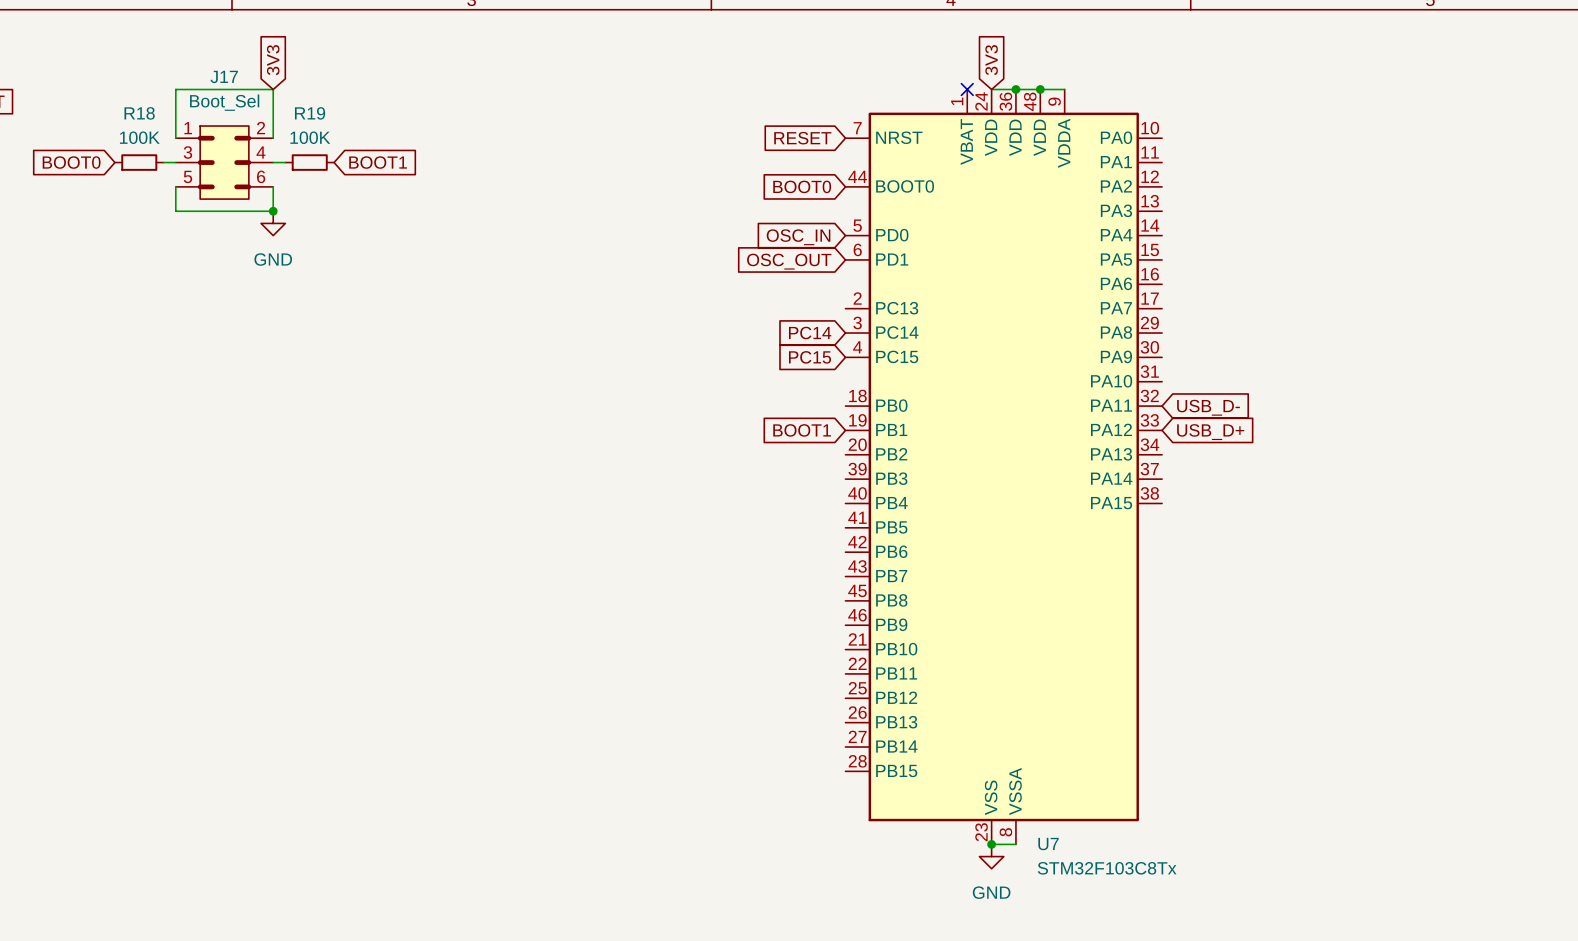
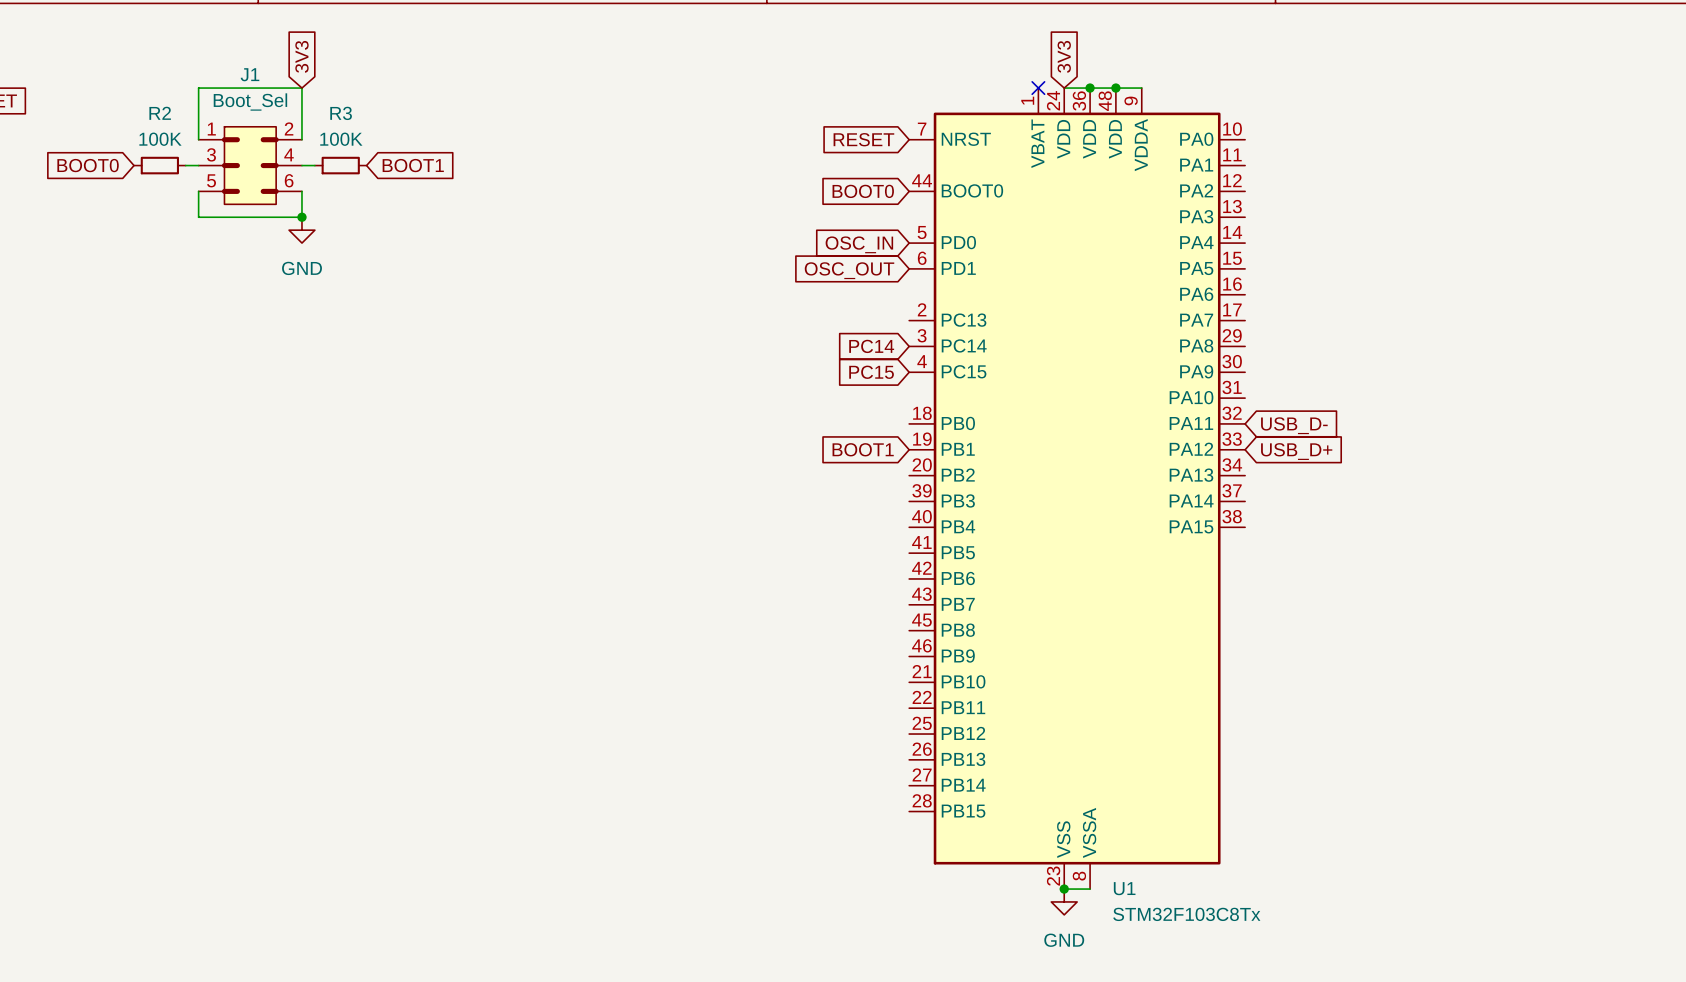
J17 name: J17 (224, 76) -> J1 (249, 74)
R18 name: R18 (139, 113) -> R2 (160, 113)
R19 name: R19 (310, 113) -> R3 (341, 113)
U7 name: U7 (1048, 844) -> U1 (1124, 888)

